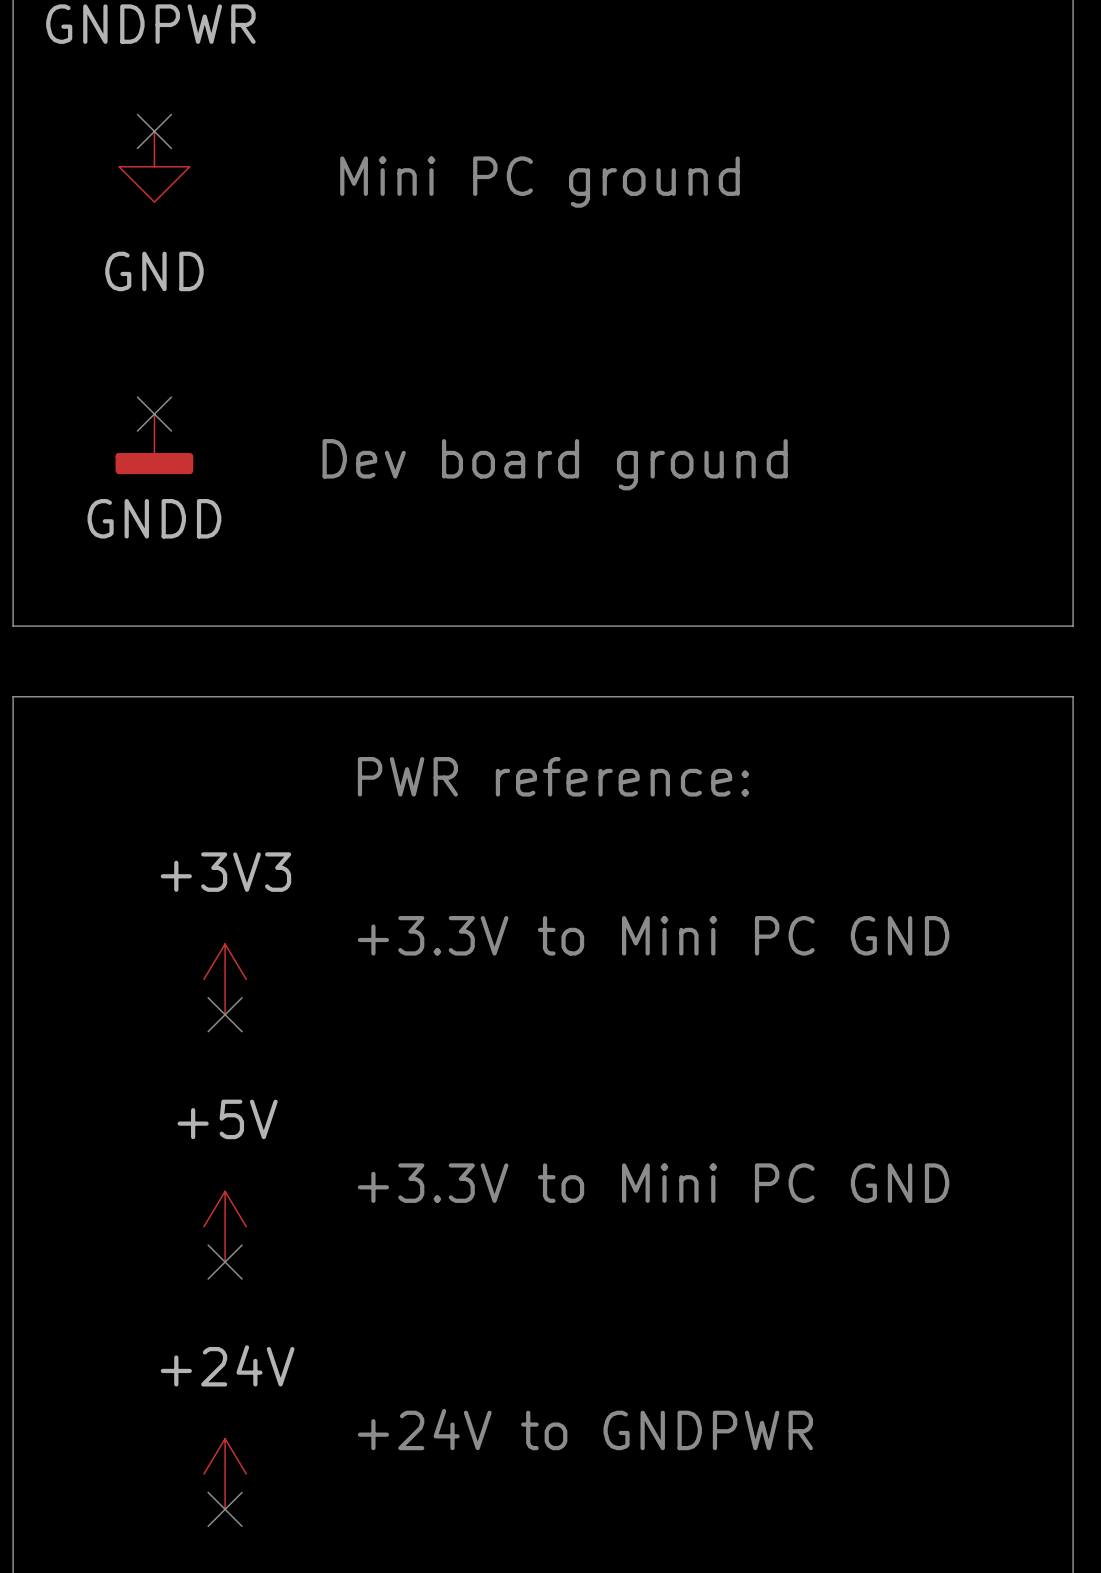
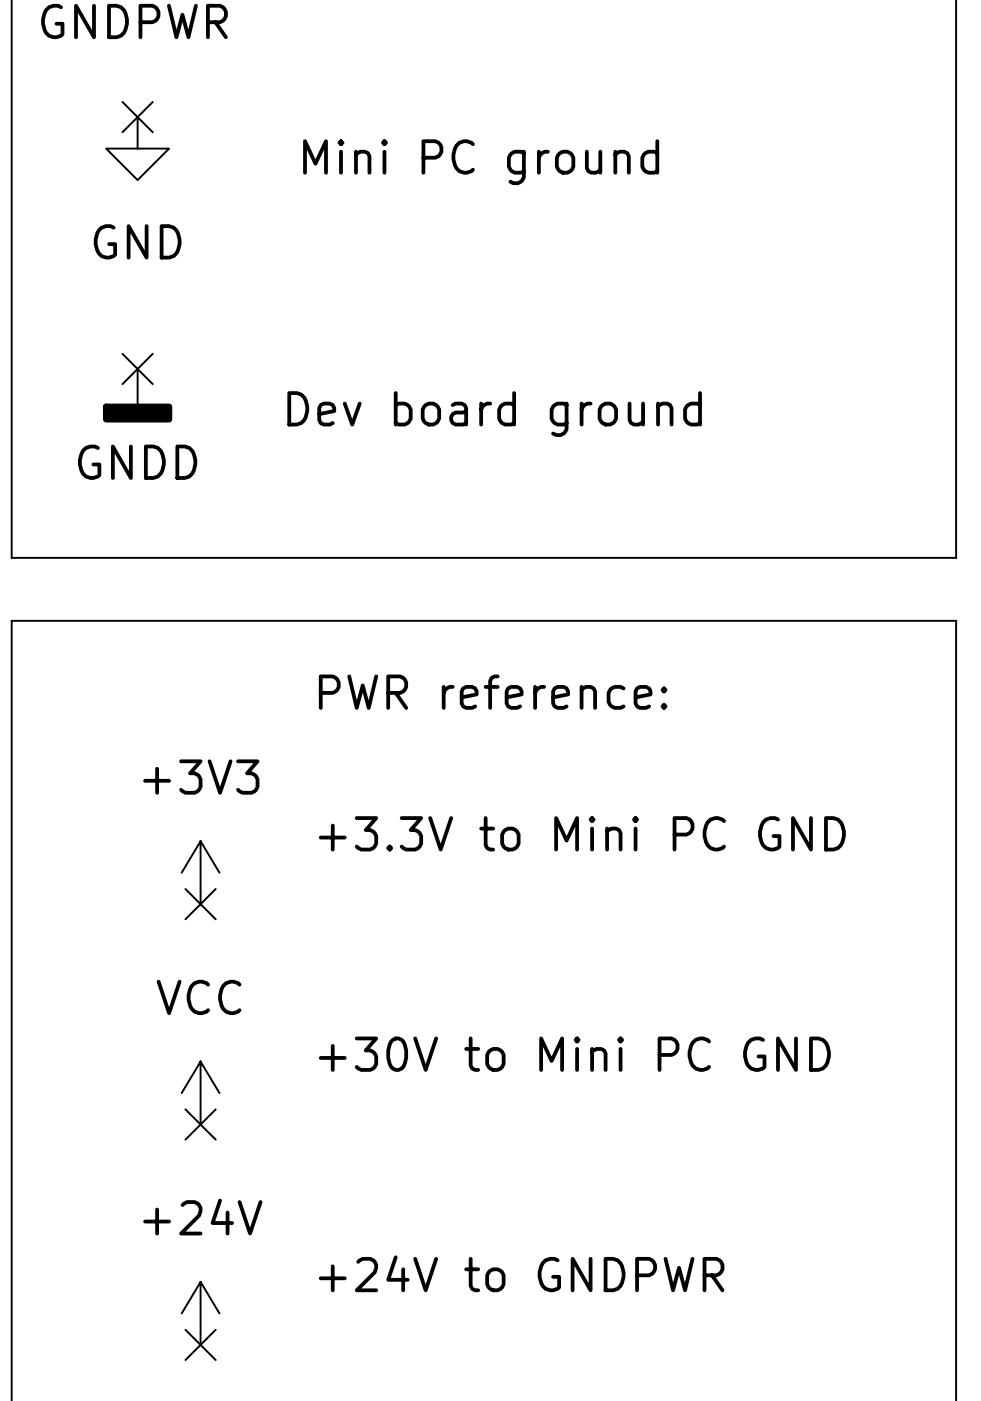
text: +3.3V to Mini PC GND (653, 1183) -> +30V to Mini PC GND (574, 1054)
power symbol: +5V (225, 1226) -> VCC (200, 1093)

